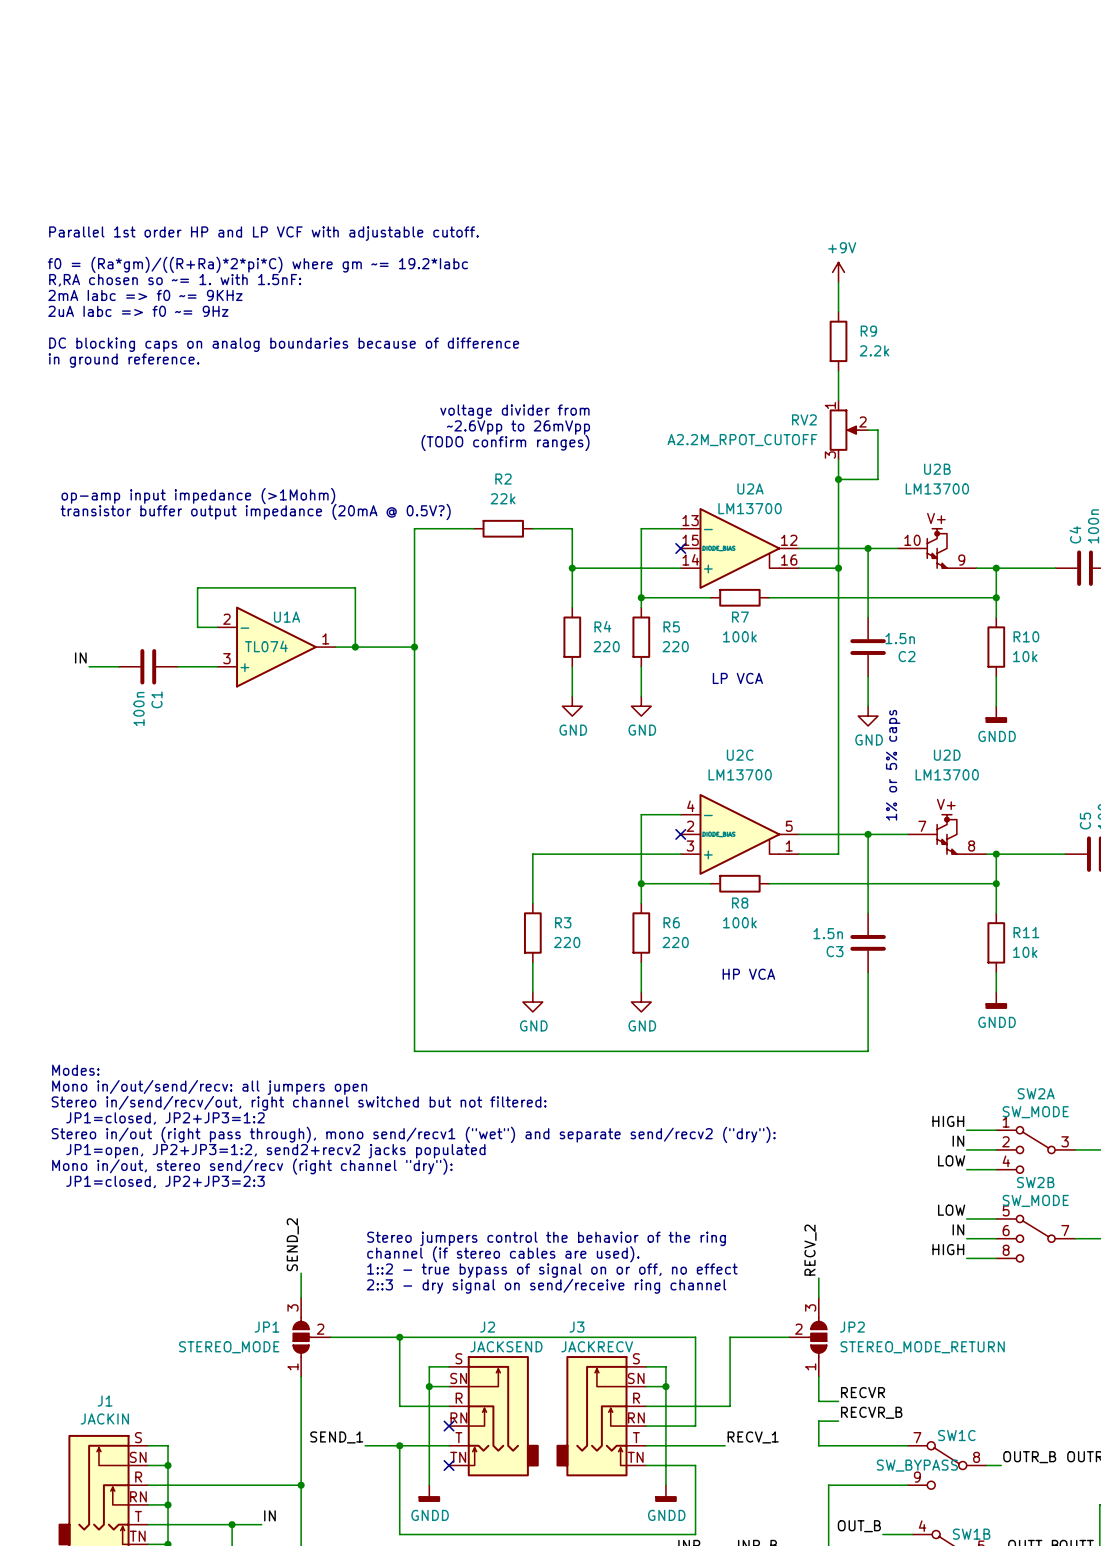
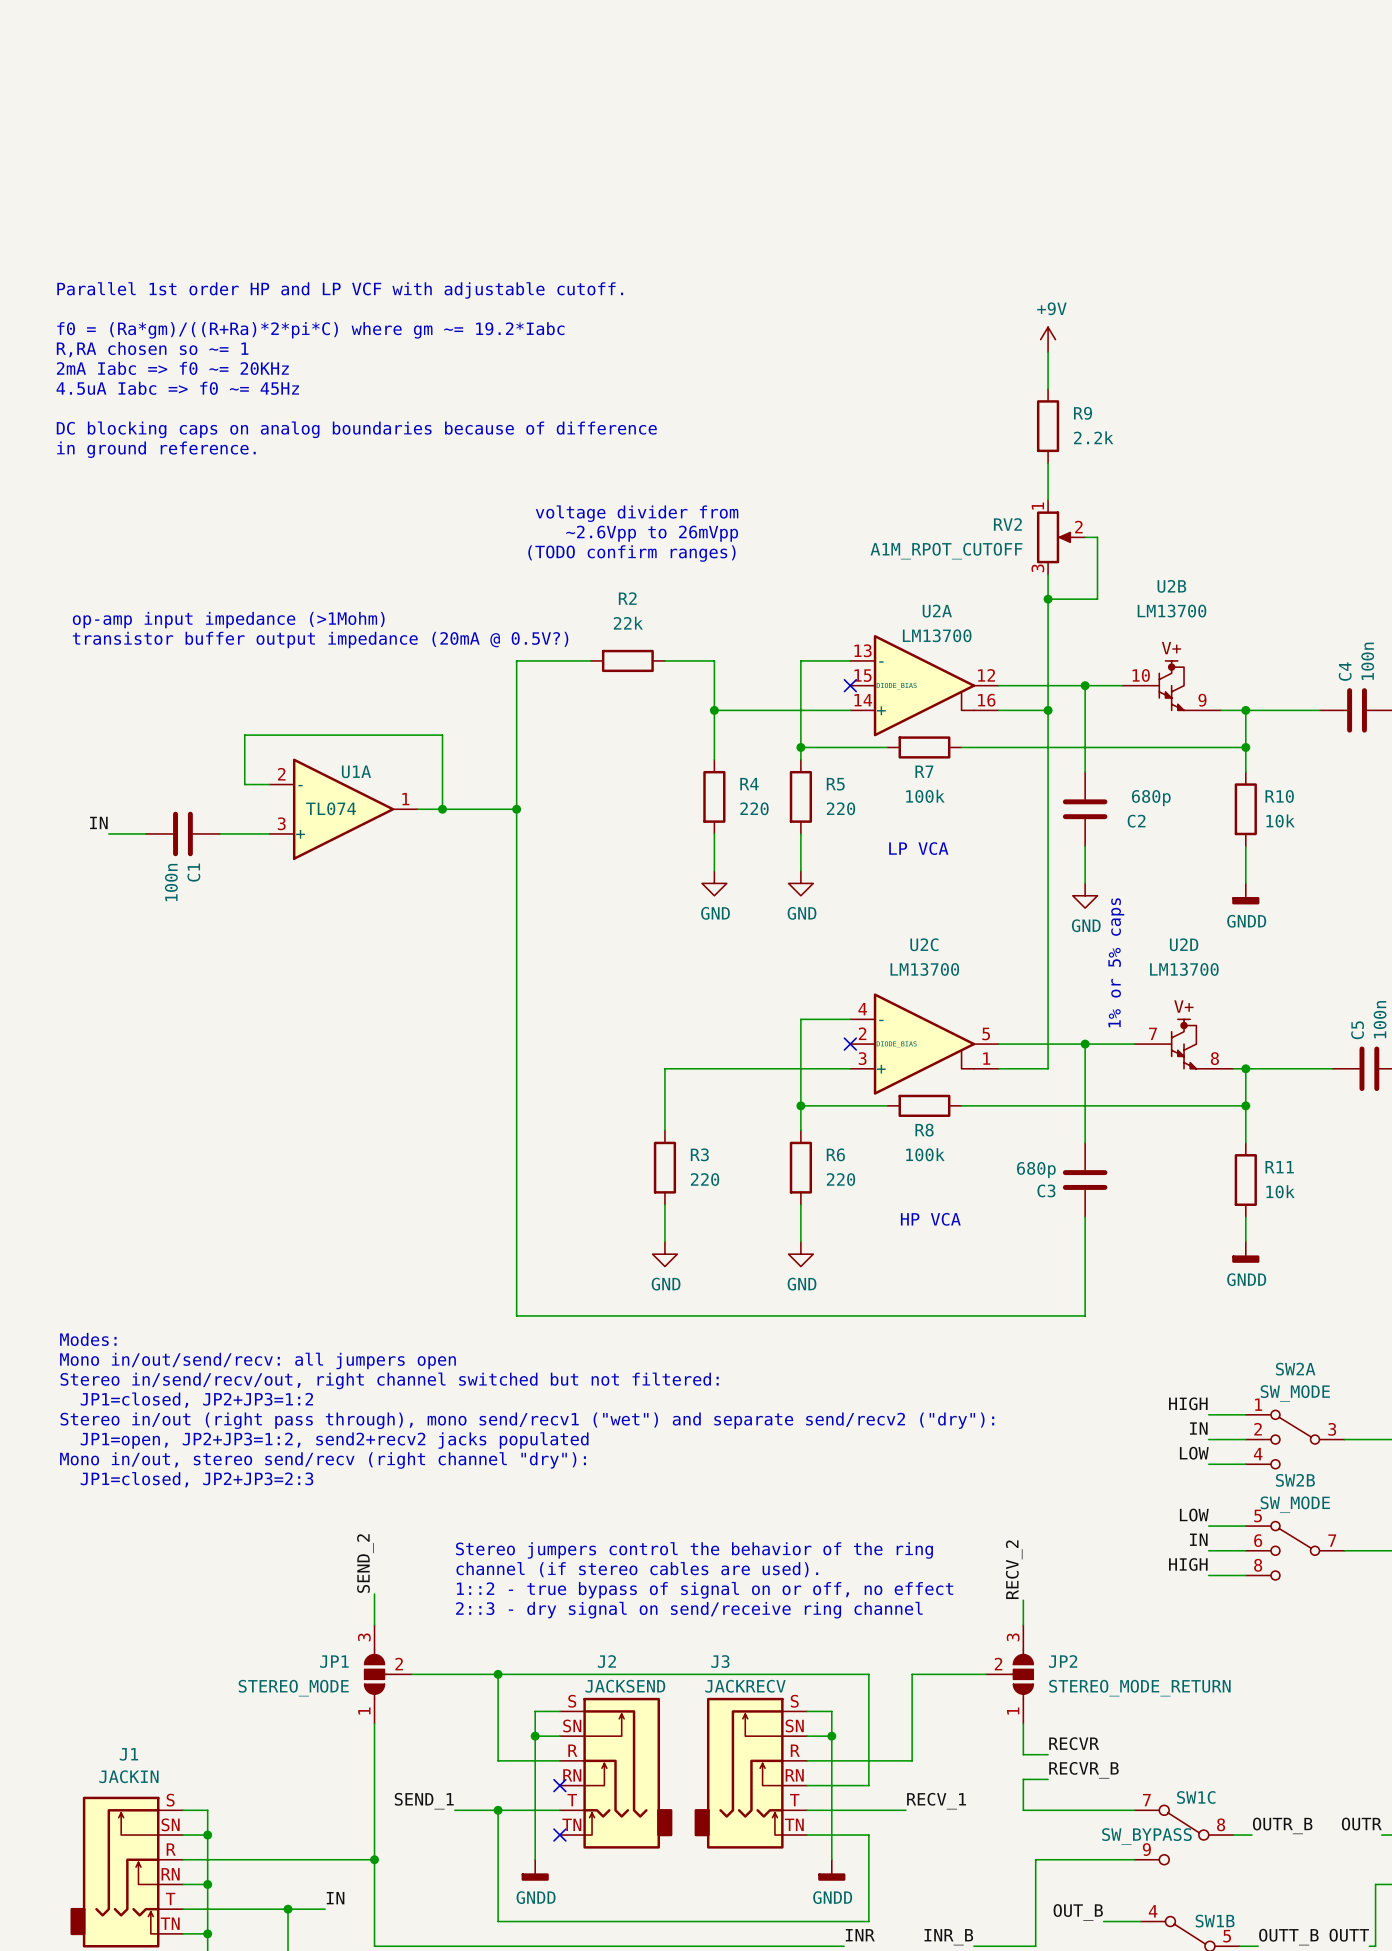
text: R,RA chosen so ~= 1. with 1.5nF: (175, 280) -> R,RA chosen so ~= 1 (152, 349)
text: 2mA Iabc => f0 ~= 9KHz (145, 295) -> 2mA Iabc => f0 ~= 20KHz (172, 368)
text: 2uA Iabc => f0 ~= 9Hz (138, 311) -> 4.5uA Iabc => f0 ~= 45Hz (177, 388)
RV2 value: A2.2M_RPOT_CUTOFF (742, 440) -> A1M_RPOT_CUTOFF (946, 551)
C2 value: 1.5n (900, 638) -> 680p (1151, 798)
C3 value: 1.5n (828, 933) -> 680p (1036, 1170)

